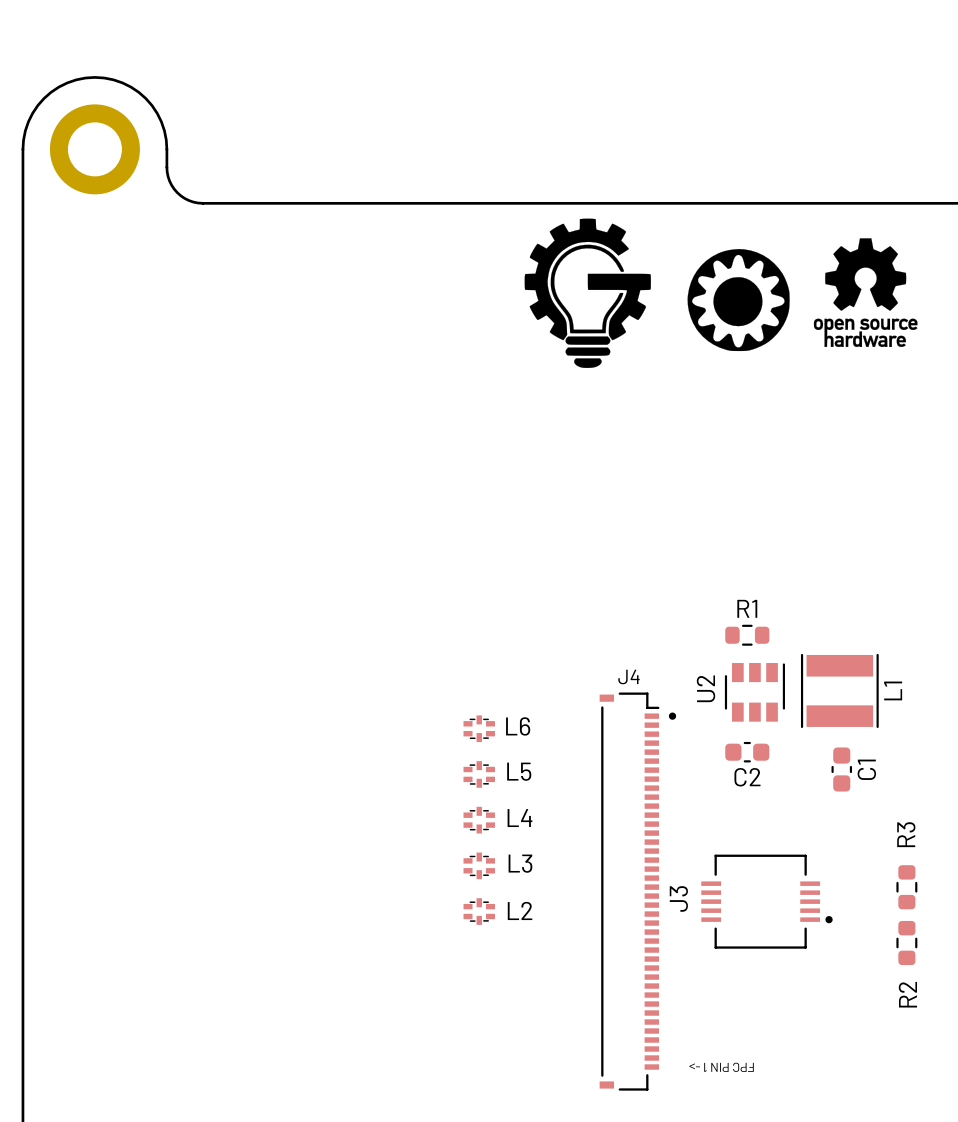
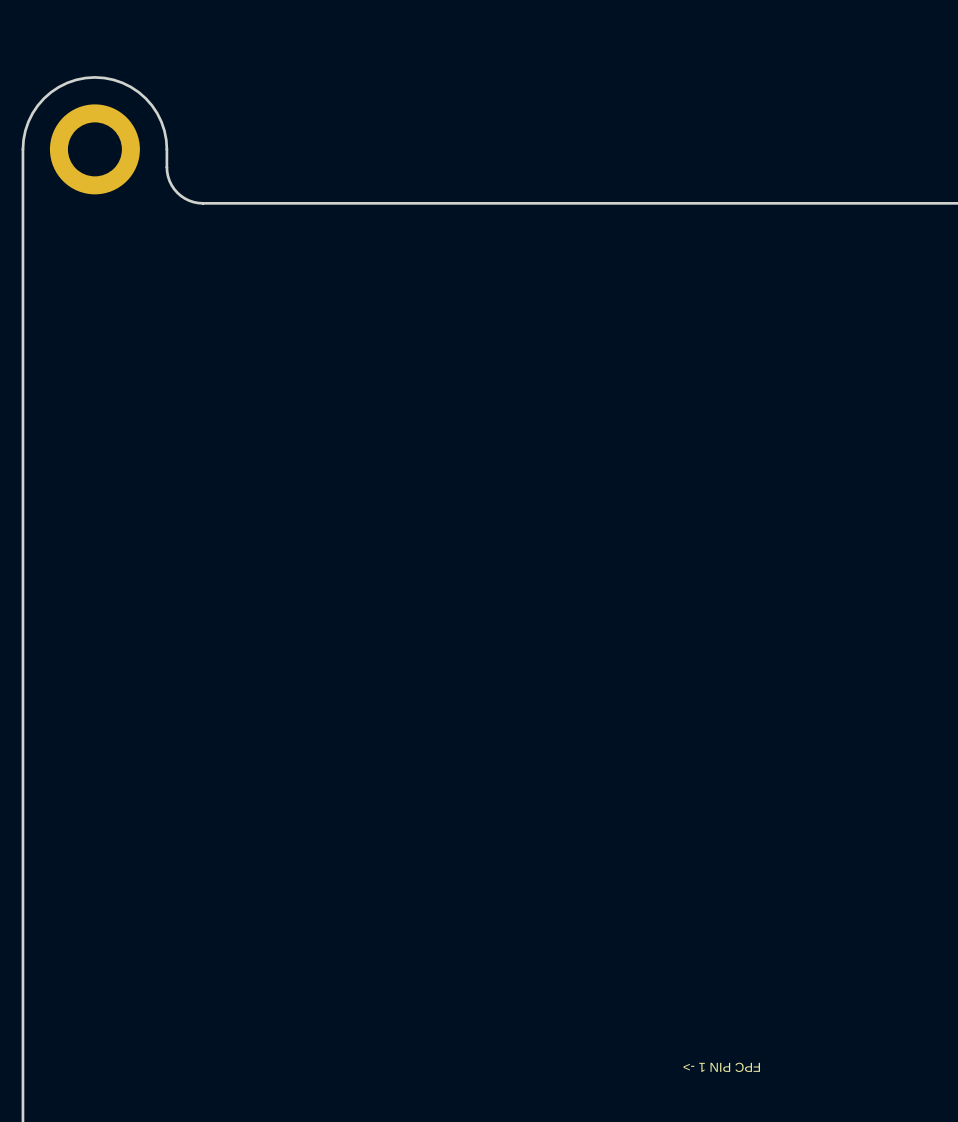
drawing: [524, 218, 651, 368] -> none
drawing: [813, 238, 918, 348] -> none
drawing: [687, 249, 790, 352] -> none
R1: (747, 635) -> none
L1: (839, 690) -> none
U2: (754, 692) -> none
L6: (479, 728) -> none
C2: (747, 752) -> none
C1: (841, 769) -> none
L5: (479, 774) -> none
L4: (479, 820) -> none
L3: (479, 865) -> none
R3: (906, 887) -> none
J4: (637, 891) -> none
J3: (766, 901) -> none
L2: (479, 911) -> none
R2: (906, 942) -> none

